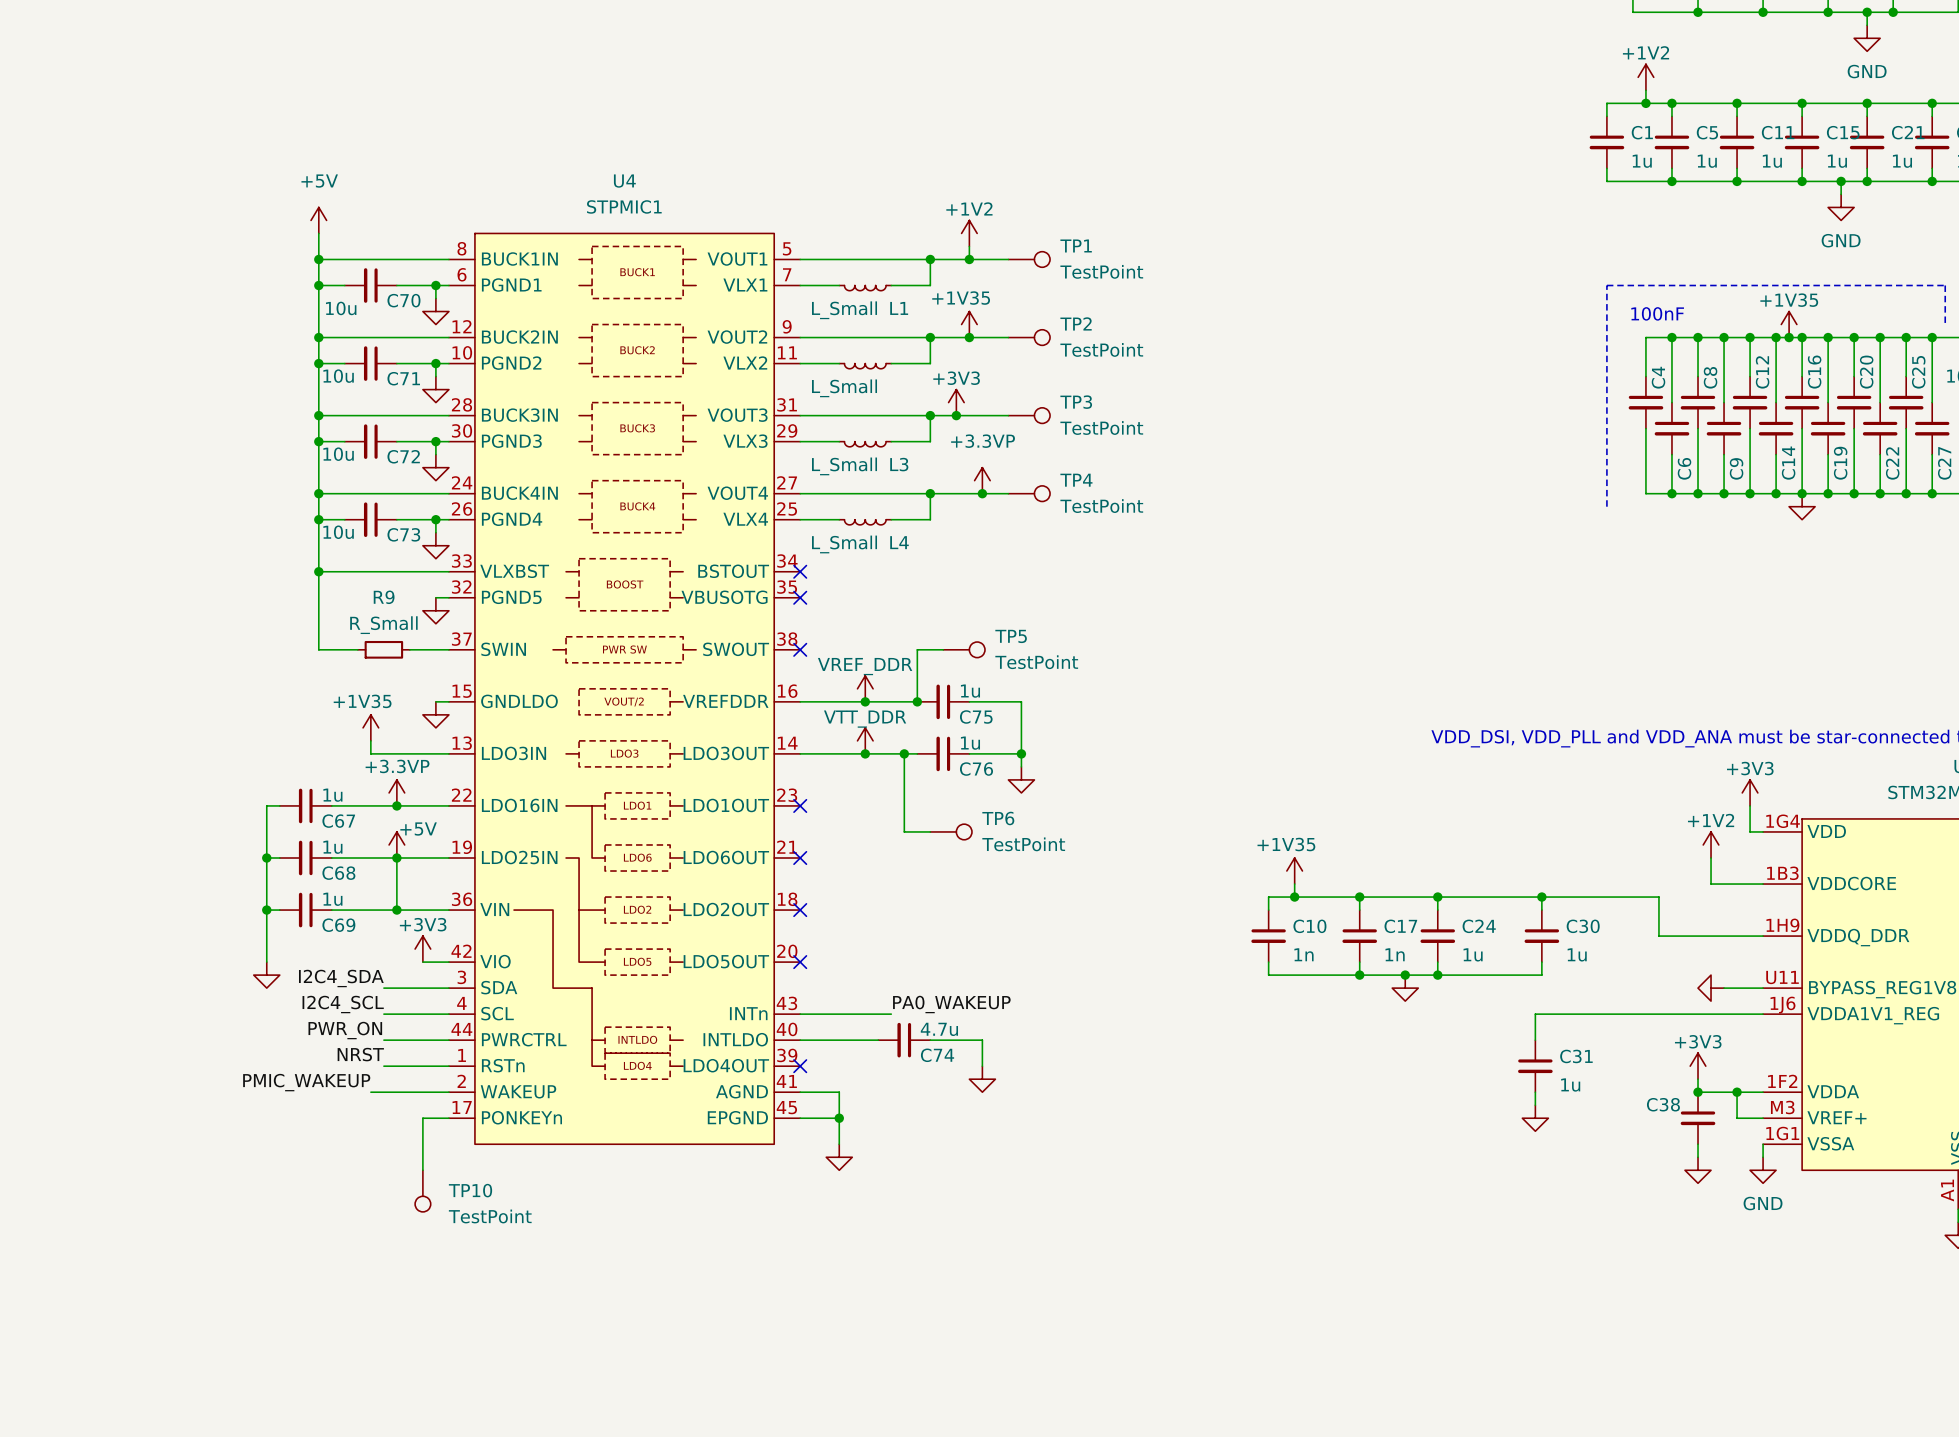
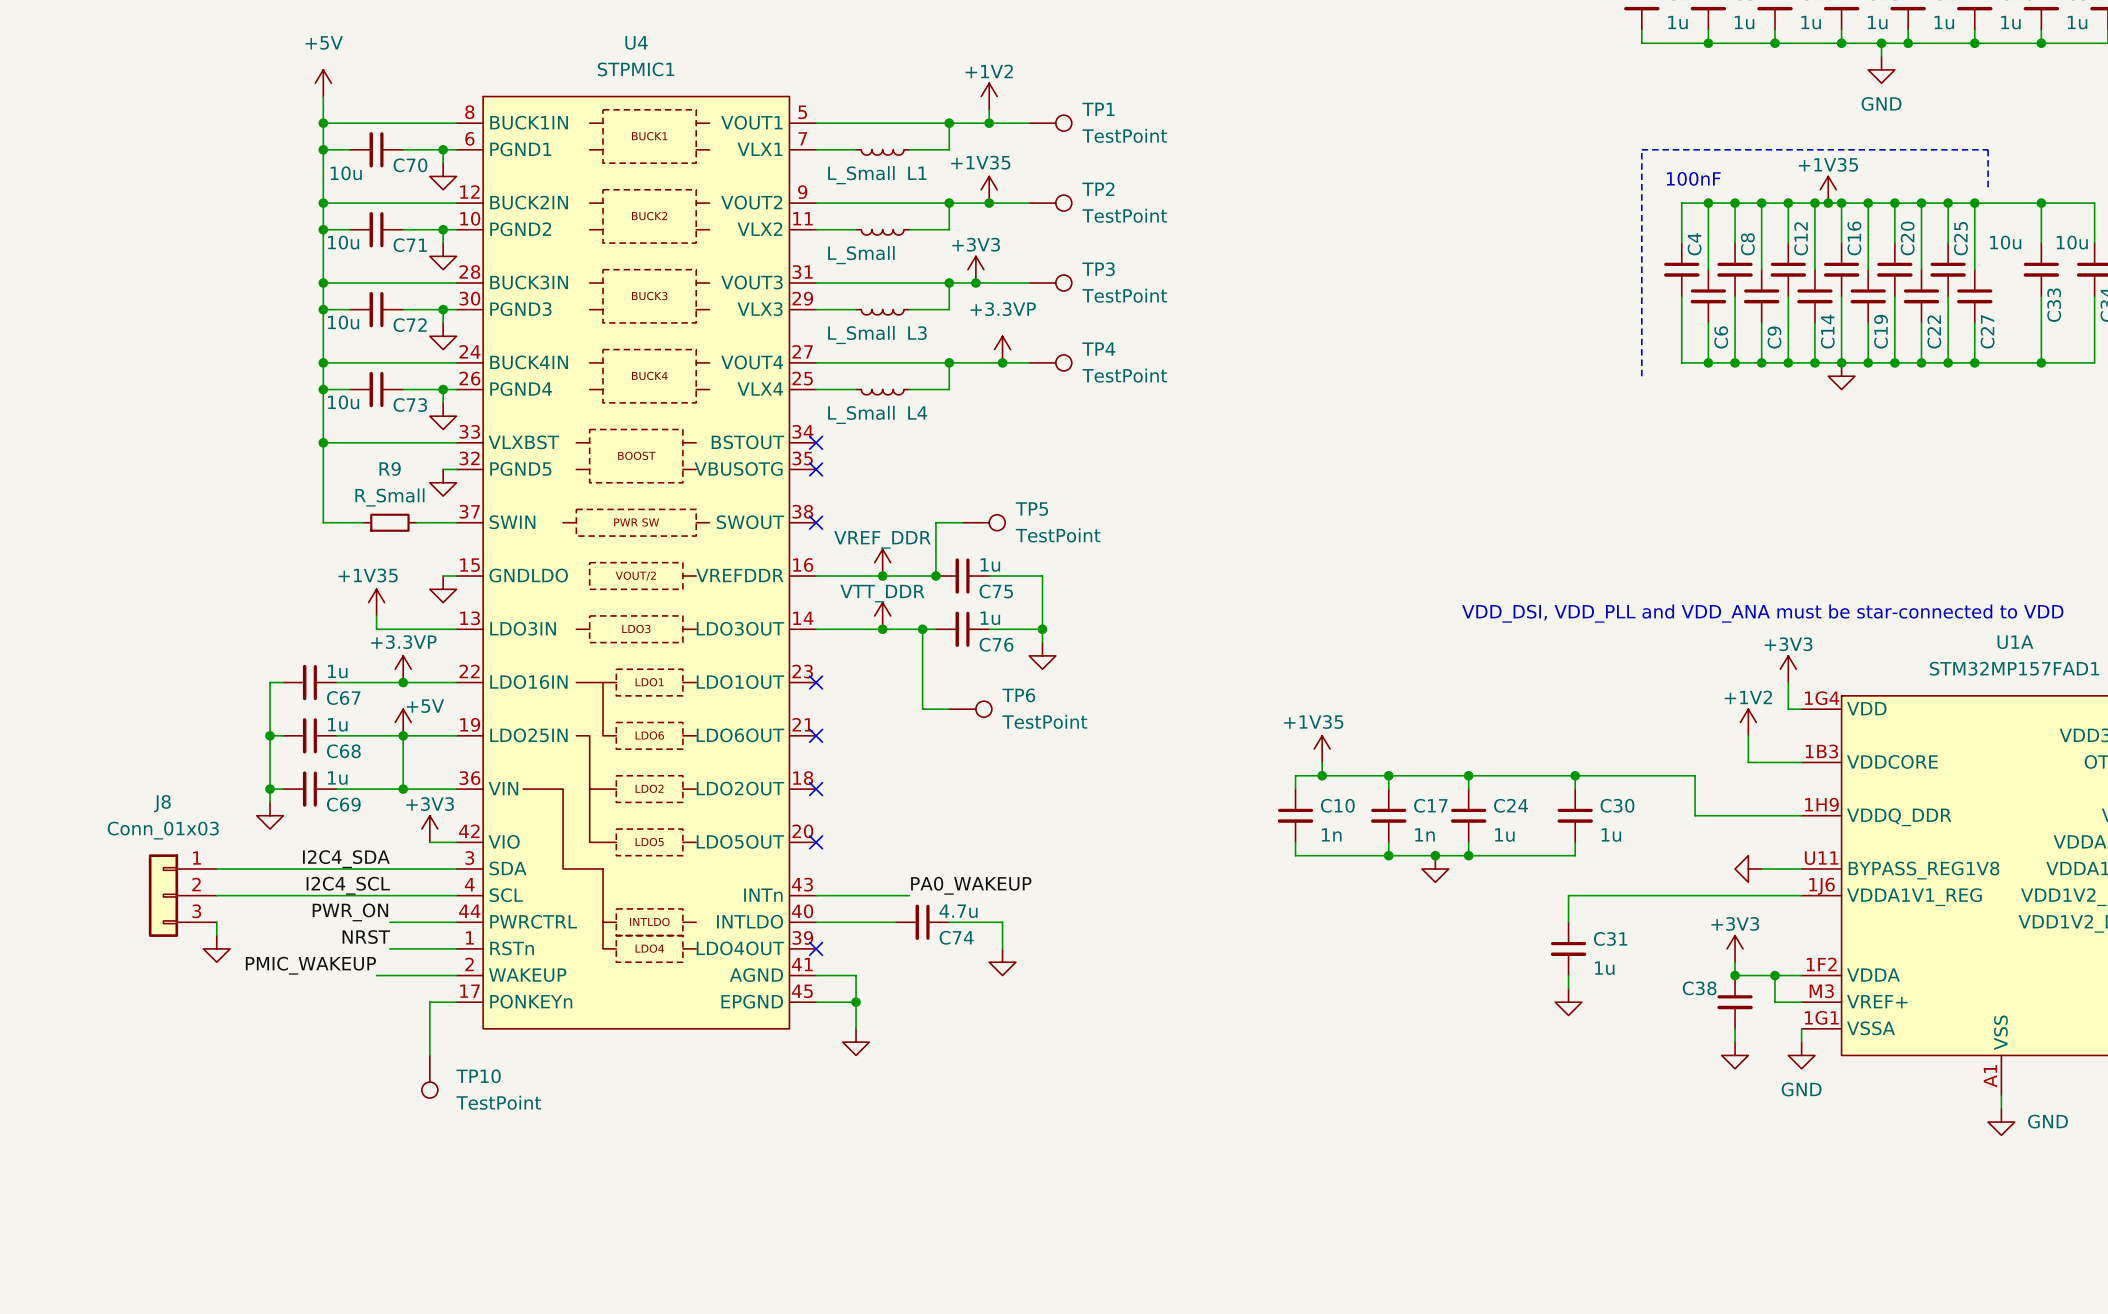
wire: (266, 923) (266, 962) -> none
power symbol position: (266, 975) -> (270, 815)
wire: none -> (216, 869) (389, 869)
J8: none -> Conn_01x03 (182, 895)
wire: none -> (216, 895) (389, 895)
wire: none -> (216, 922) (216, 935)
power symbol: none -> (216, 948)

